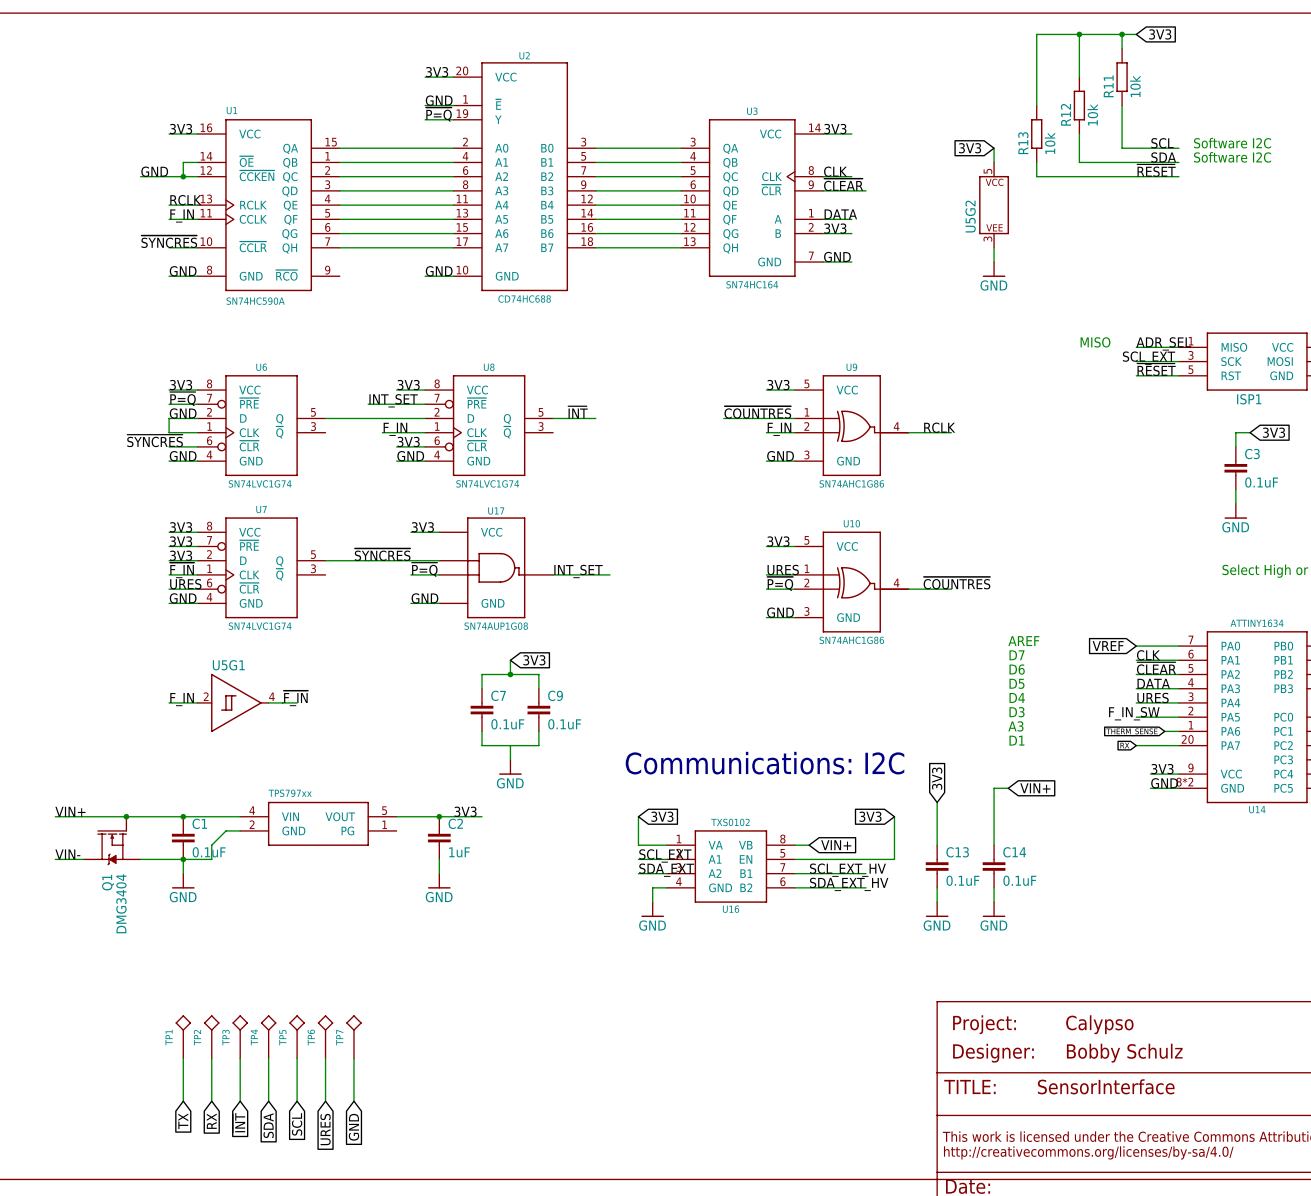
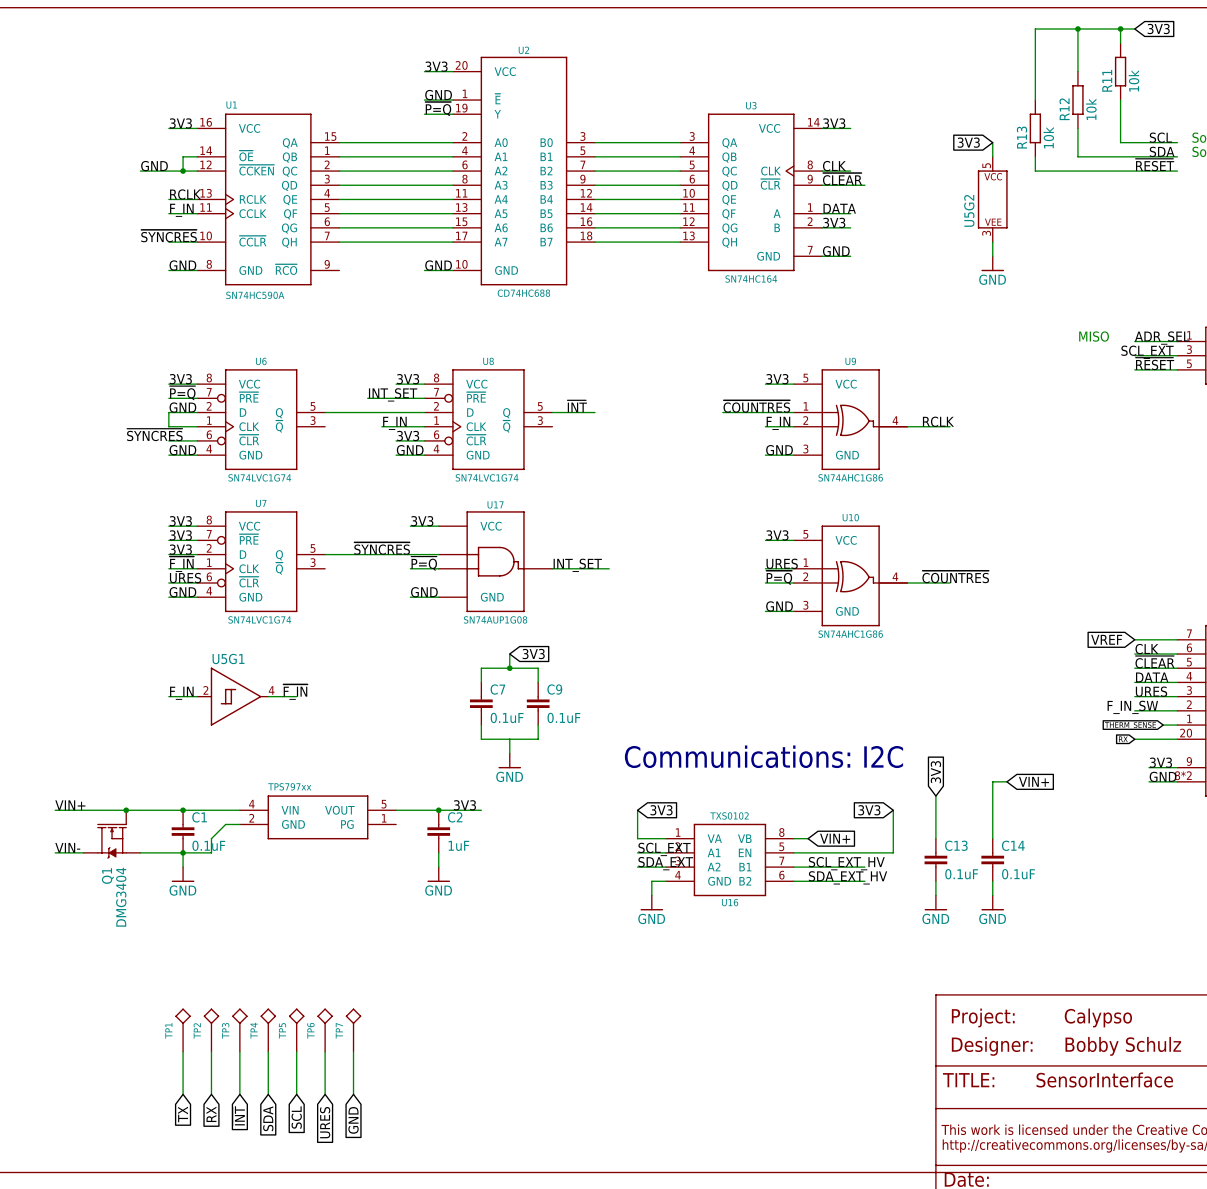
text: AREF (1023, 641) -> none
text: D7 (1016, 655) -> none
text: D6 (1017, 669) -> none
text: D5 (1016, 683) -> none
text: D4 (1017, 697) -> none
text: D3 (1017, 712) -> none
text: A3 (1015, 726) -> none
text: D1 (1016, 740) -> none

